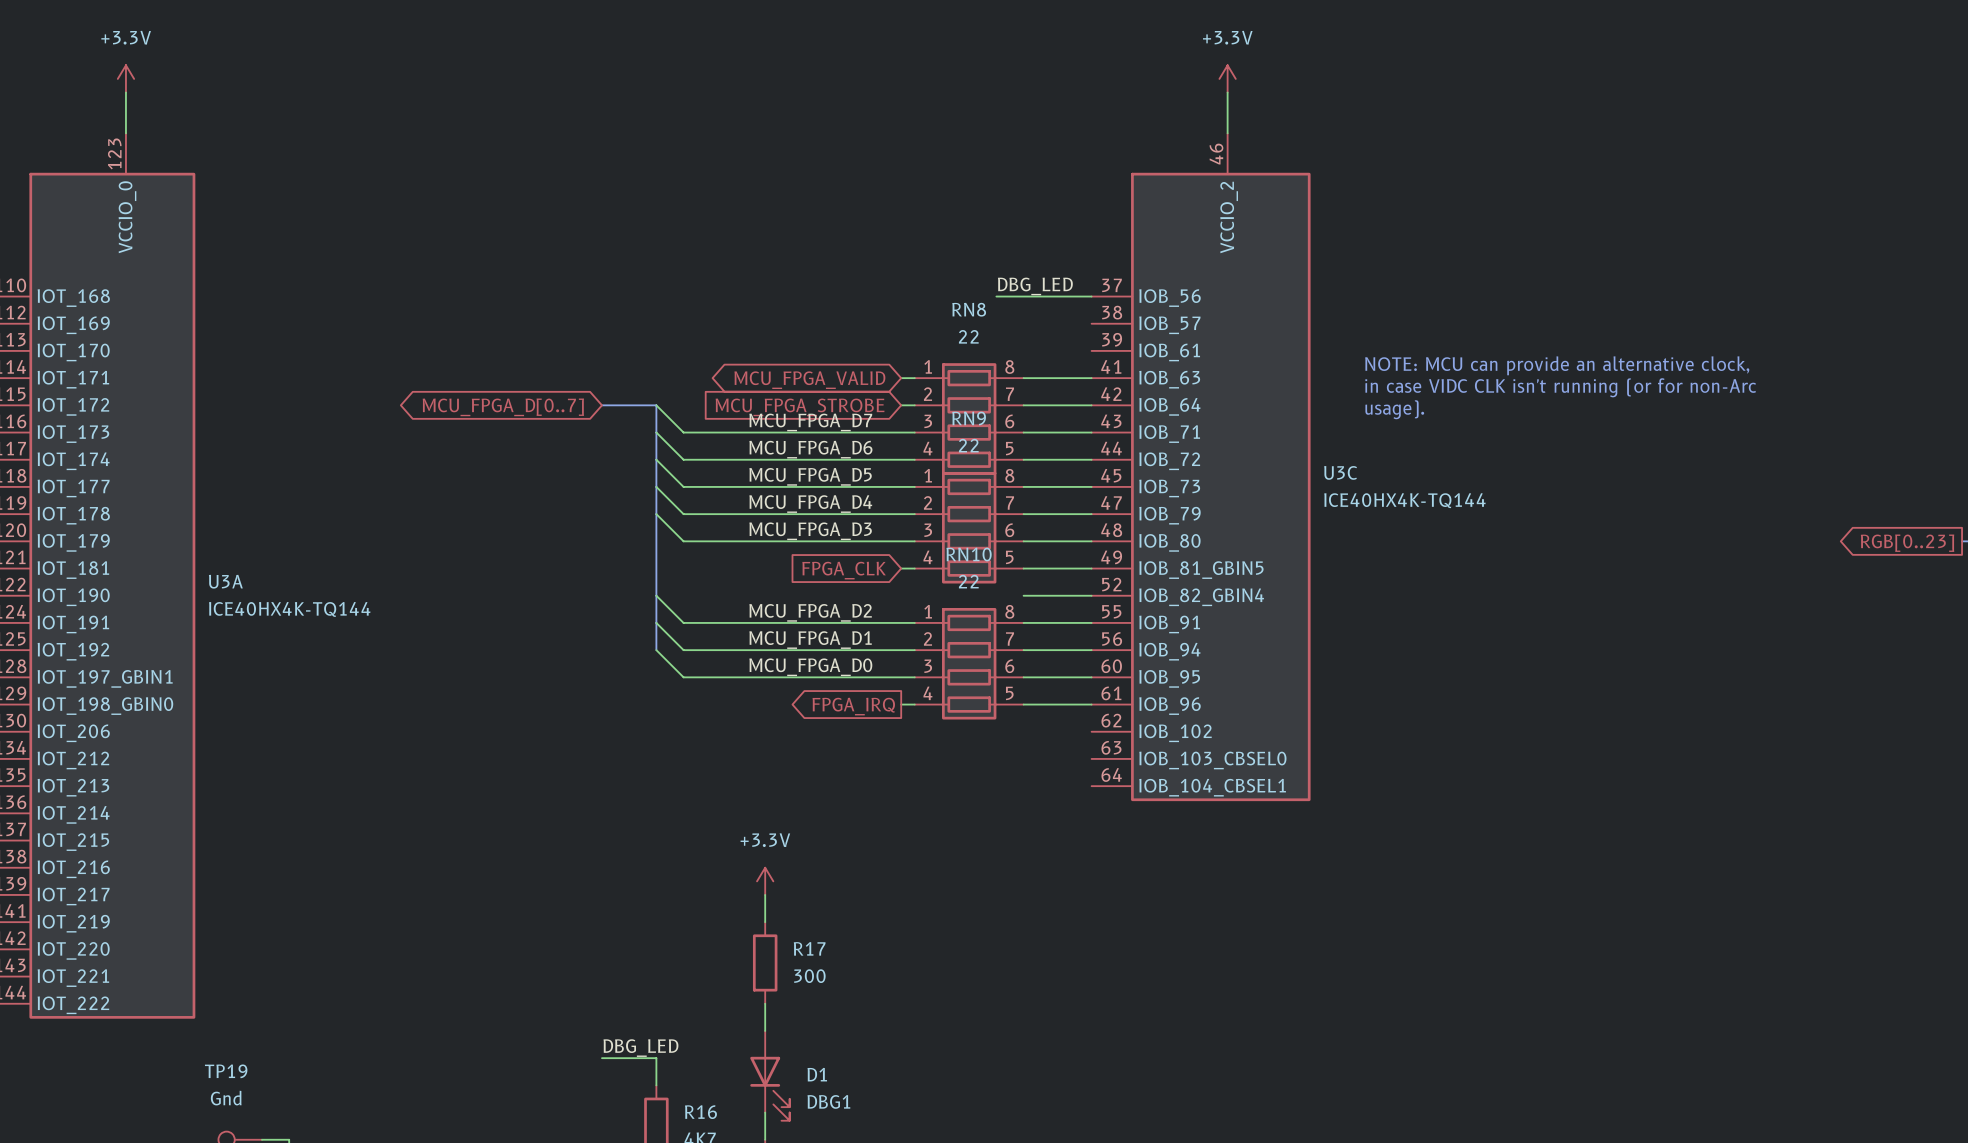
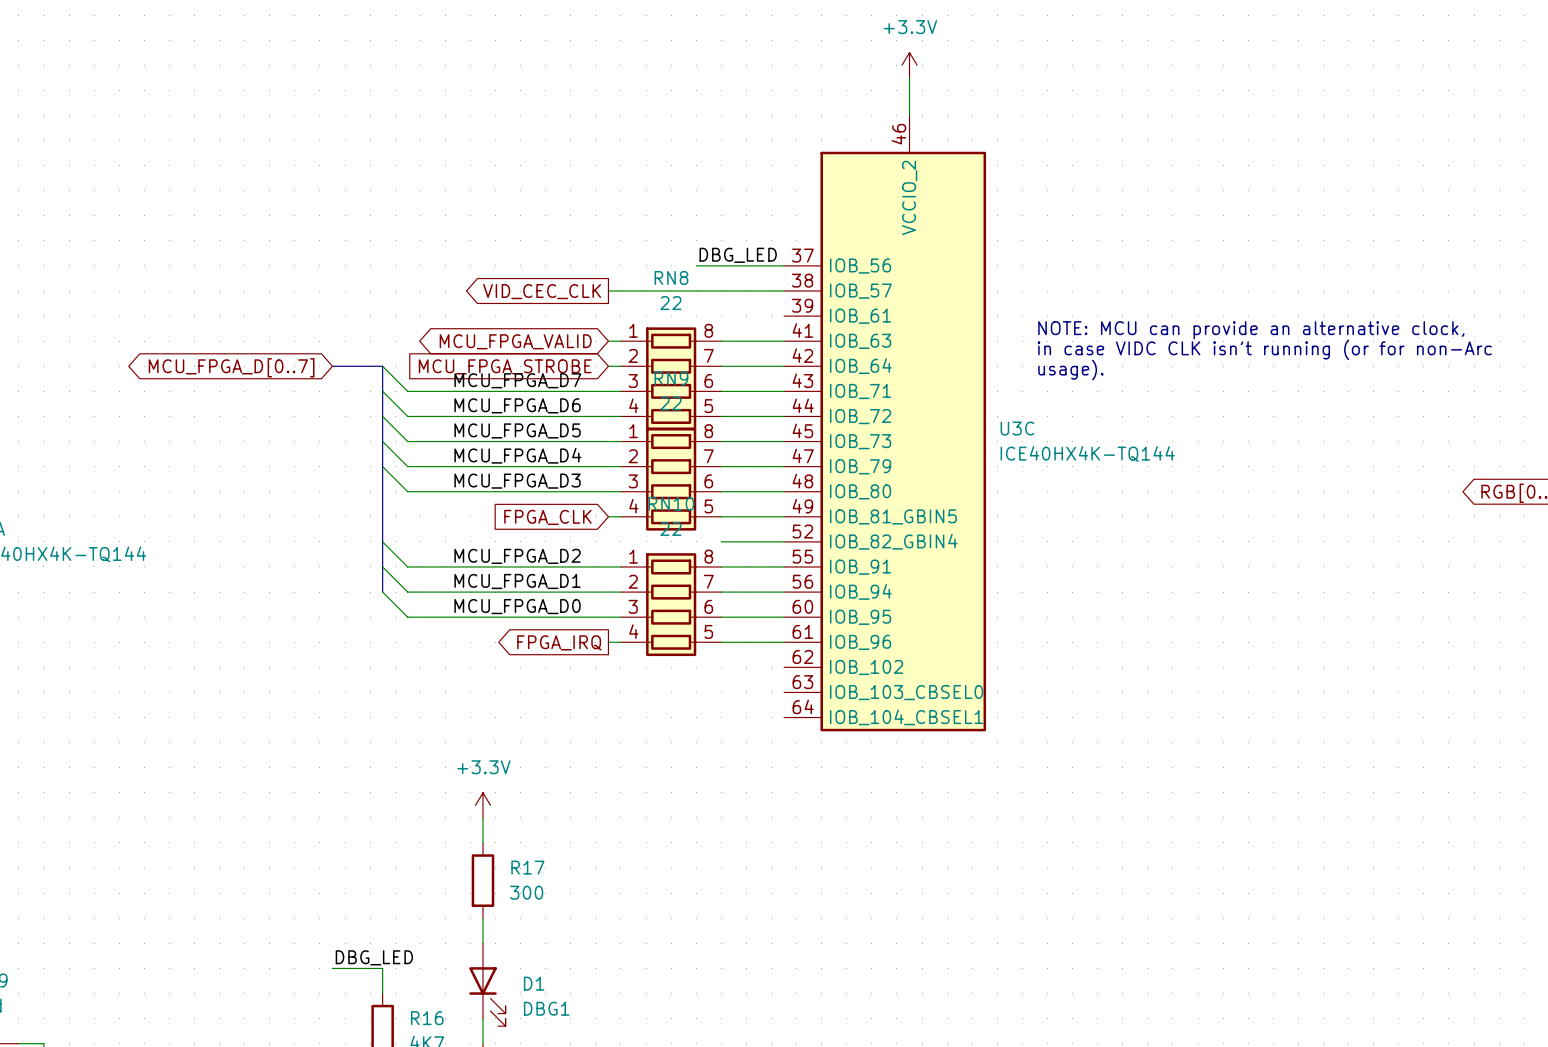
wire: none -> (608, 291) (784, 291)
global label: none -> VID_CEC_CLK (542, 291)

